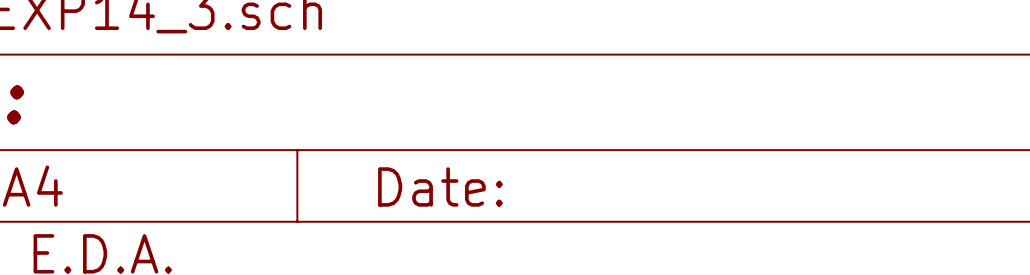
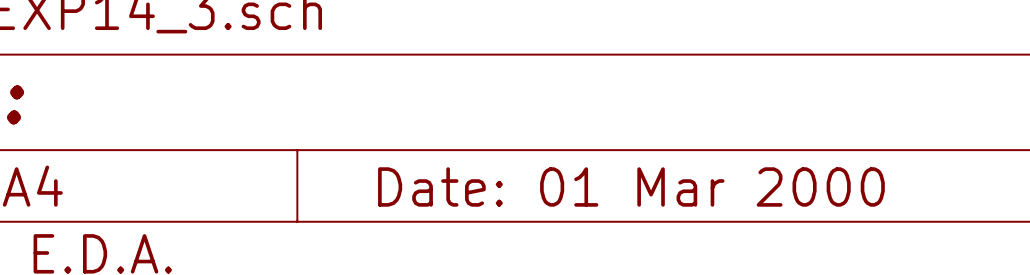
title block: Date: (440, 186) -> Date: 01 Mar 2000 (631, 186)

